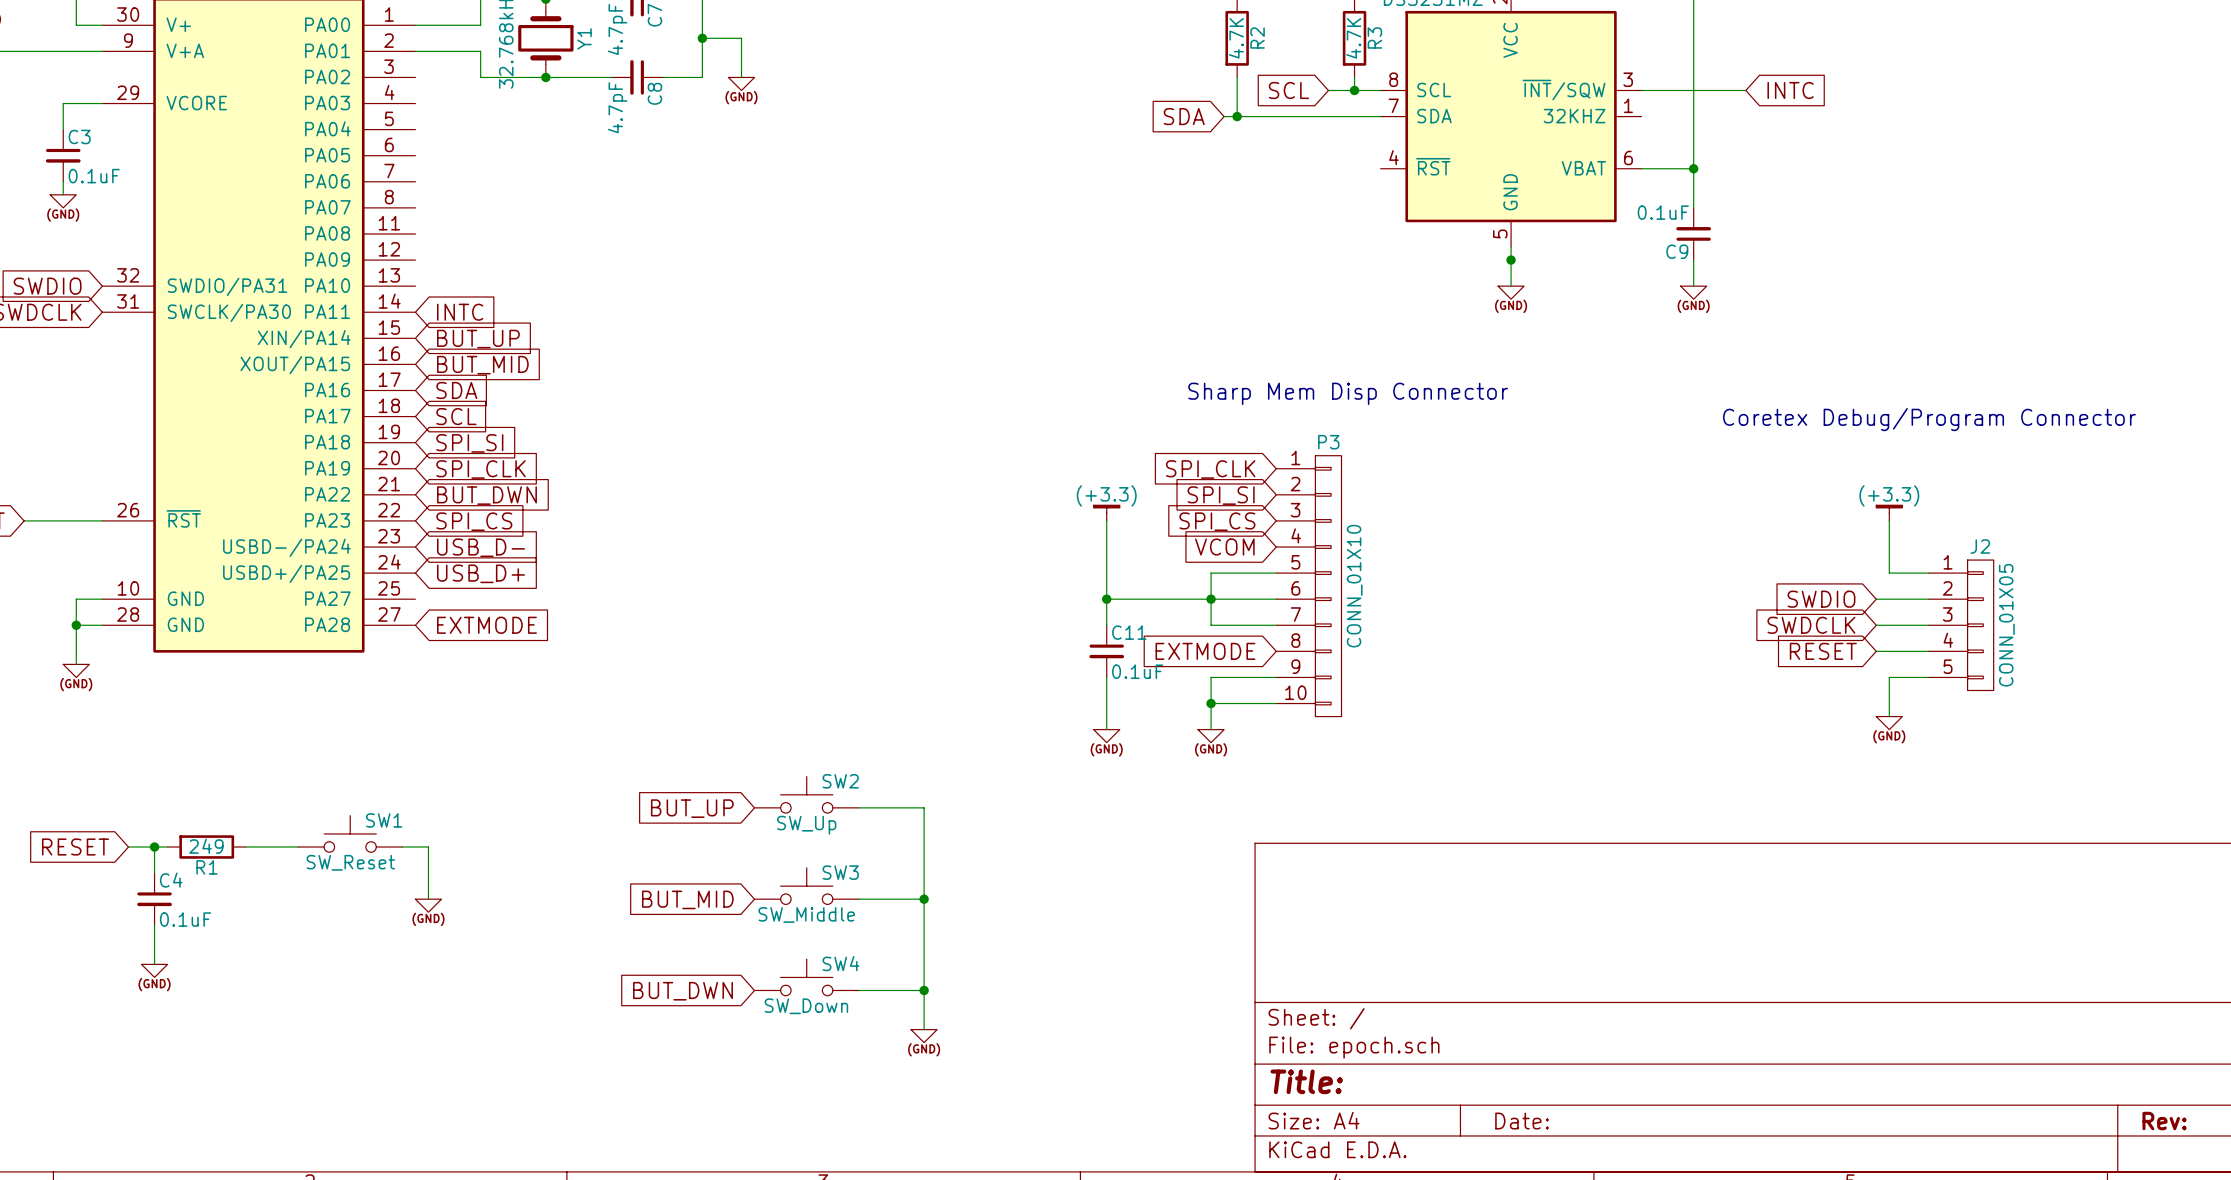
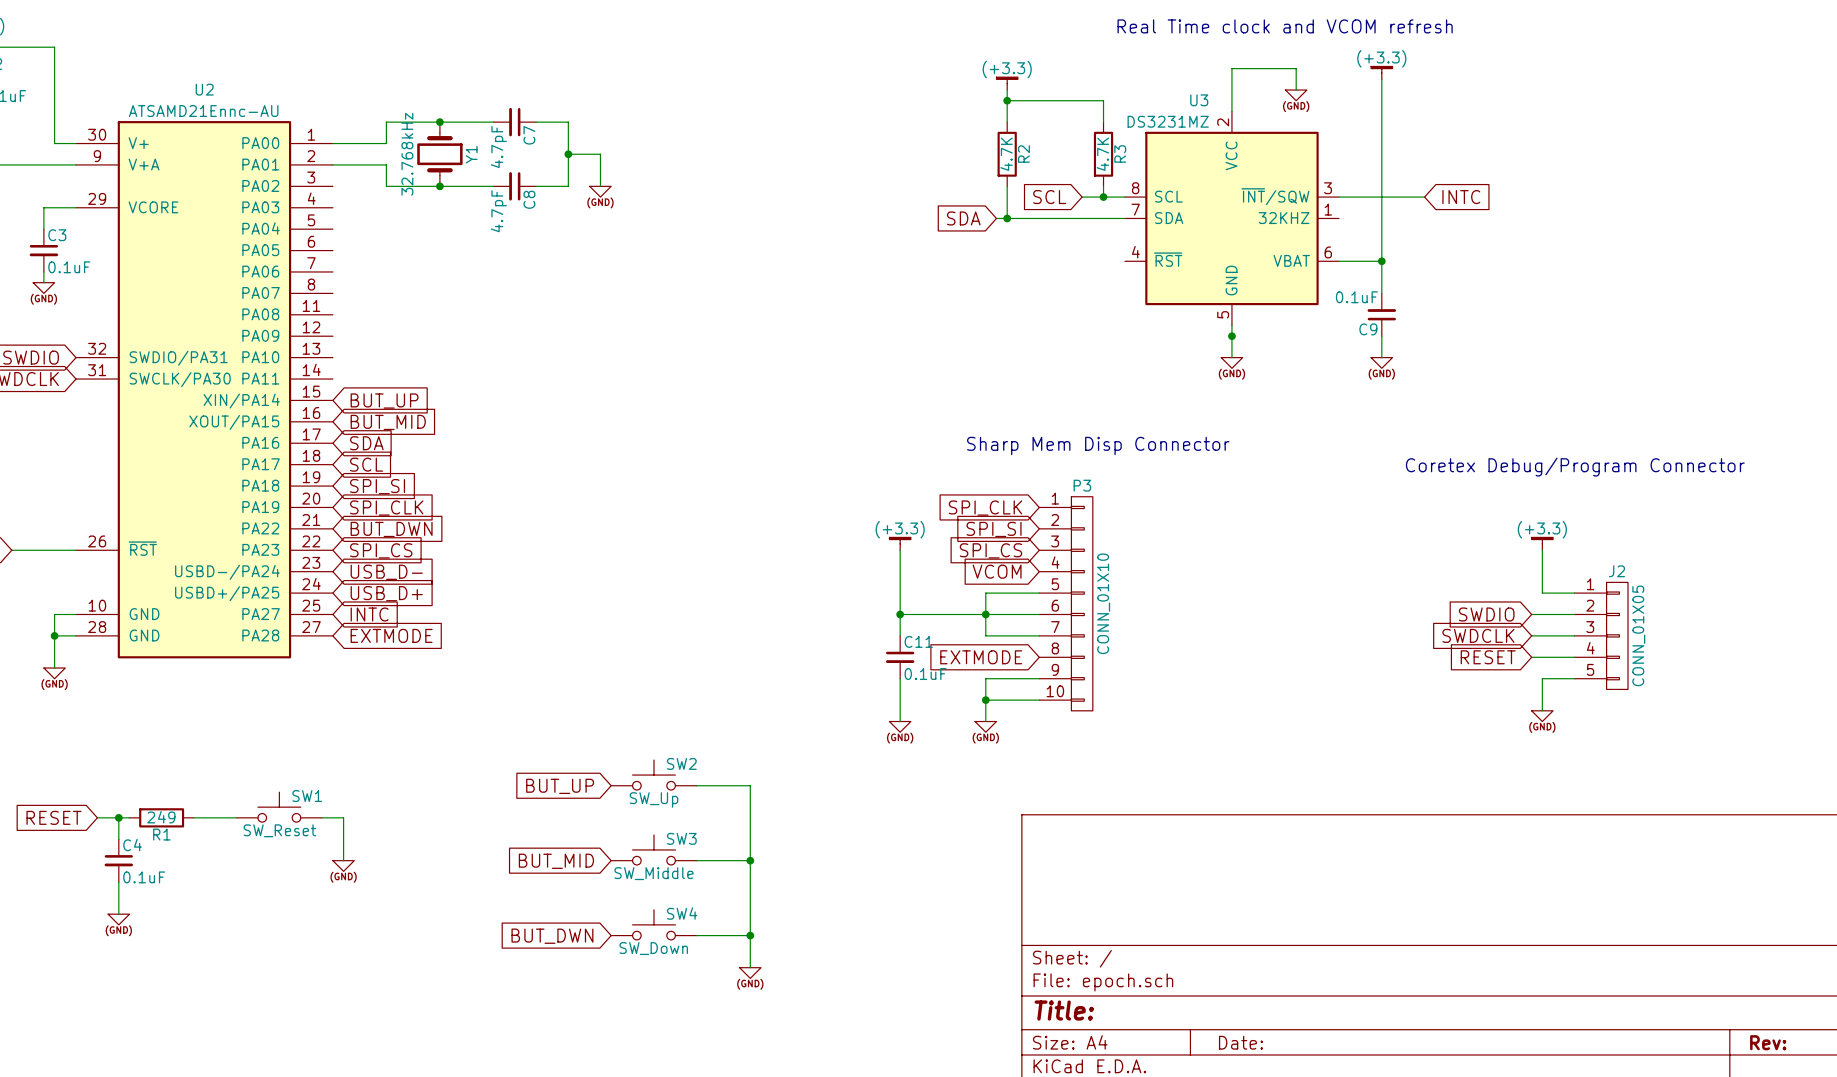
global label: INTC (460, 312) -> none
global label: none -> INTC (369, 614)

